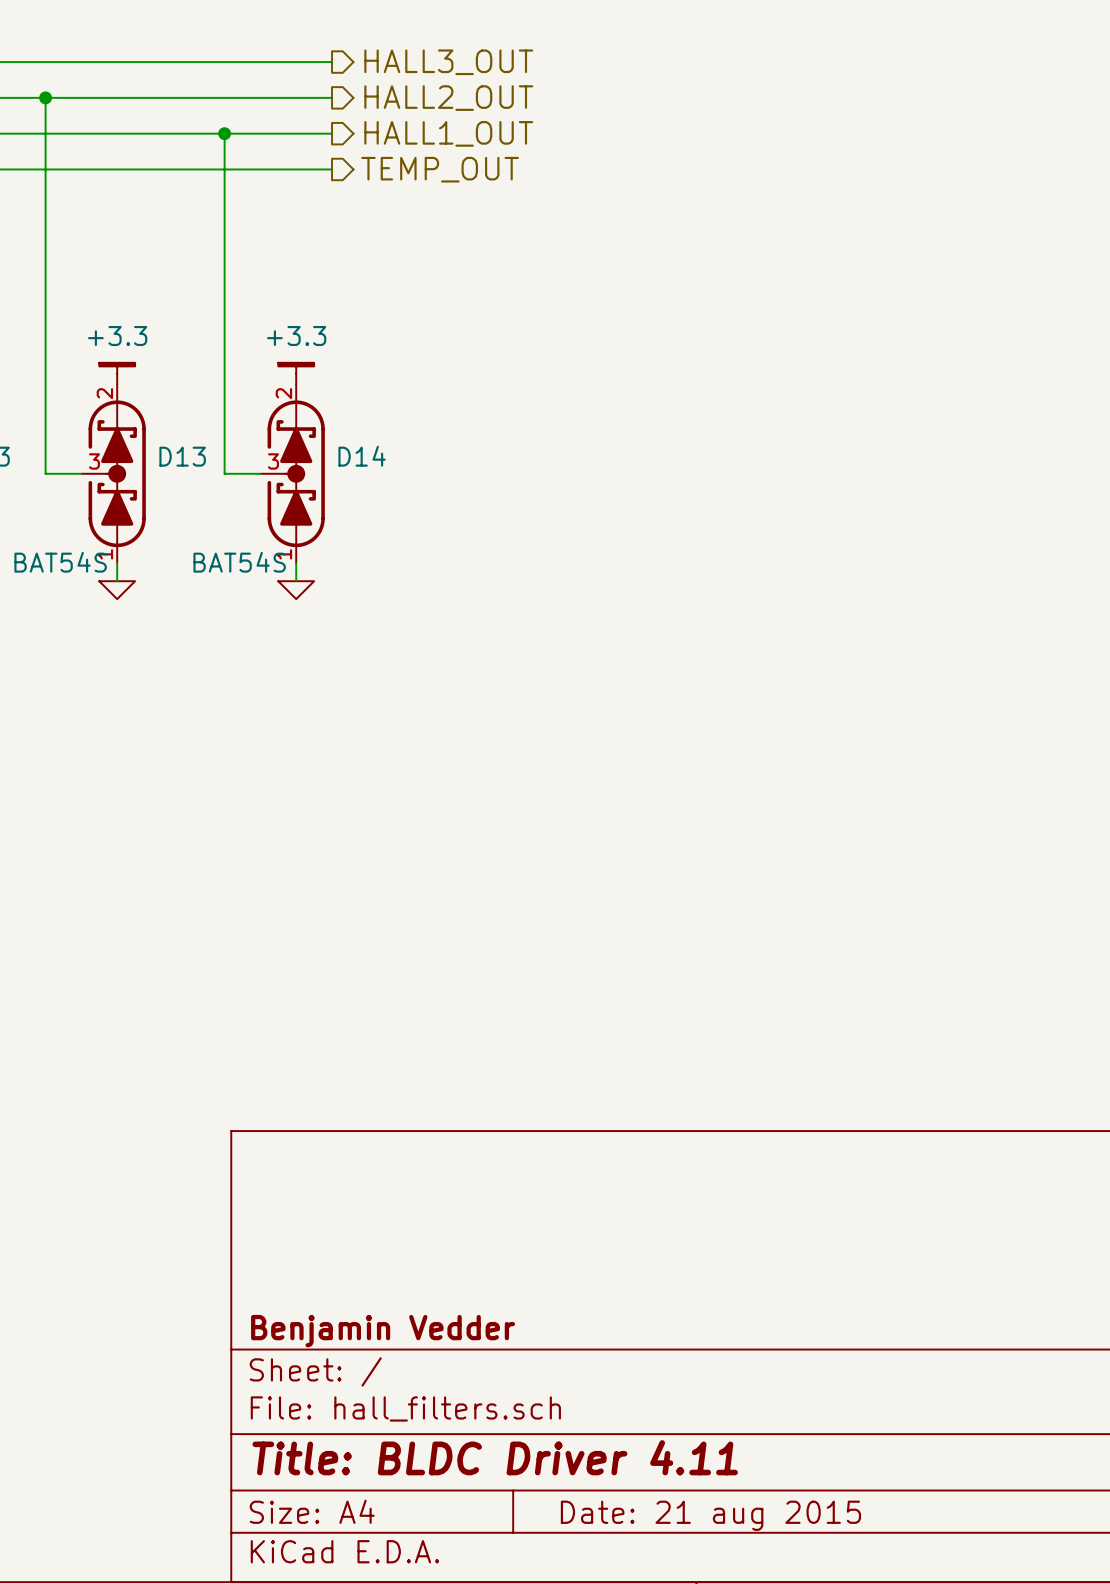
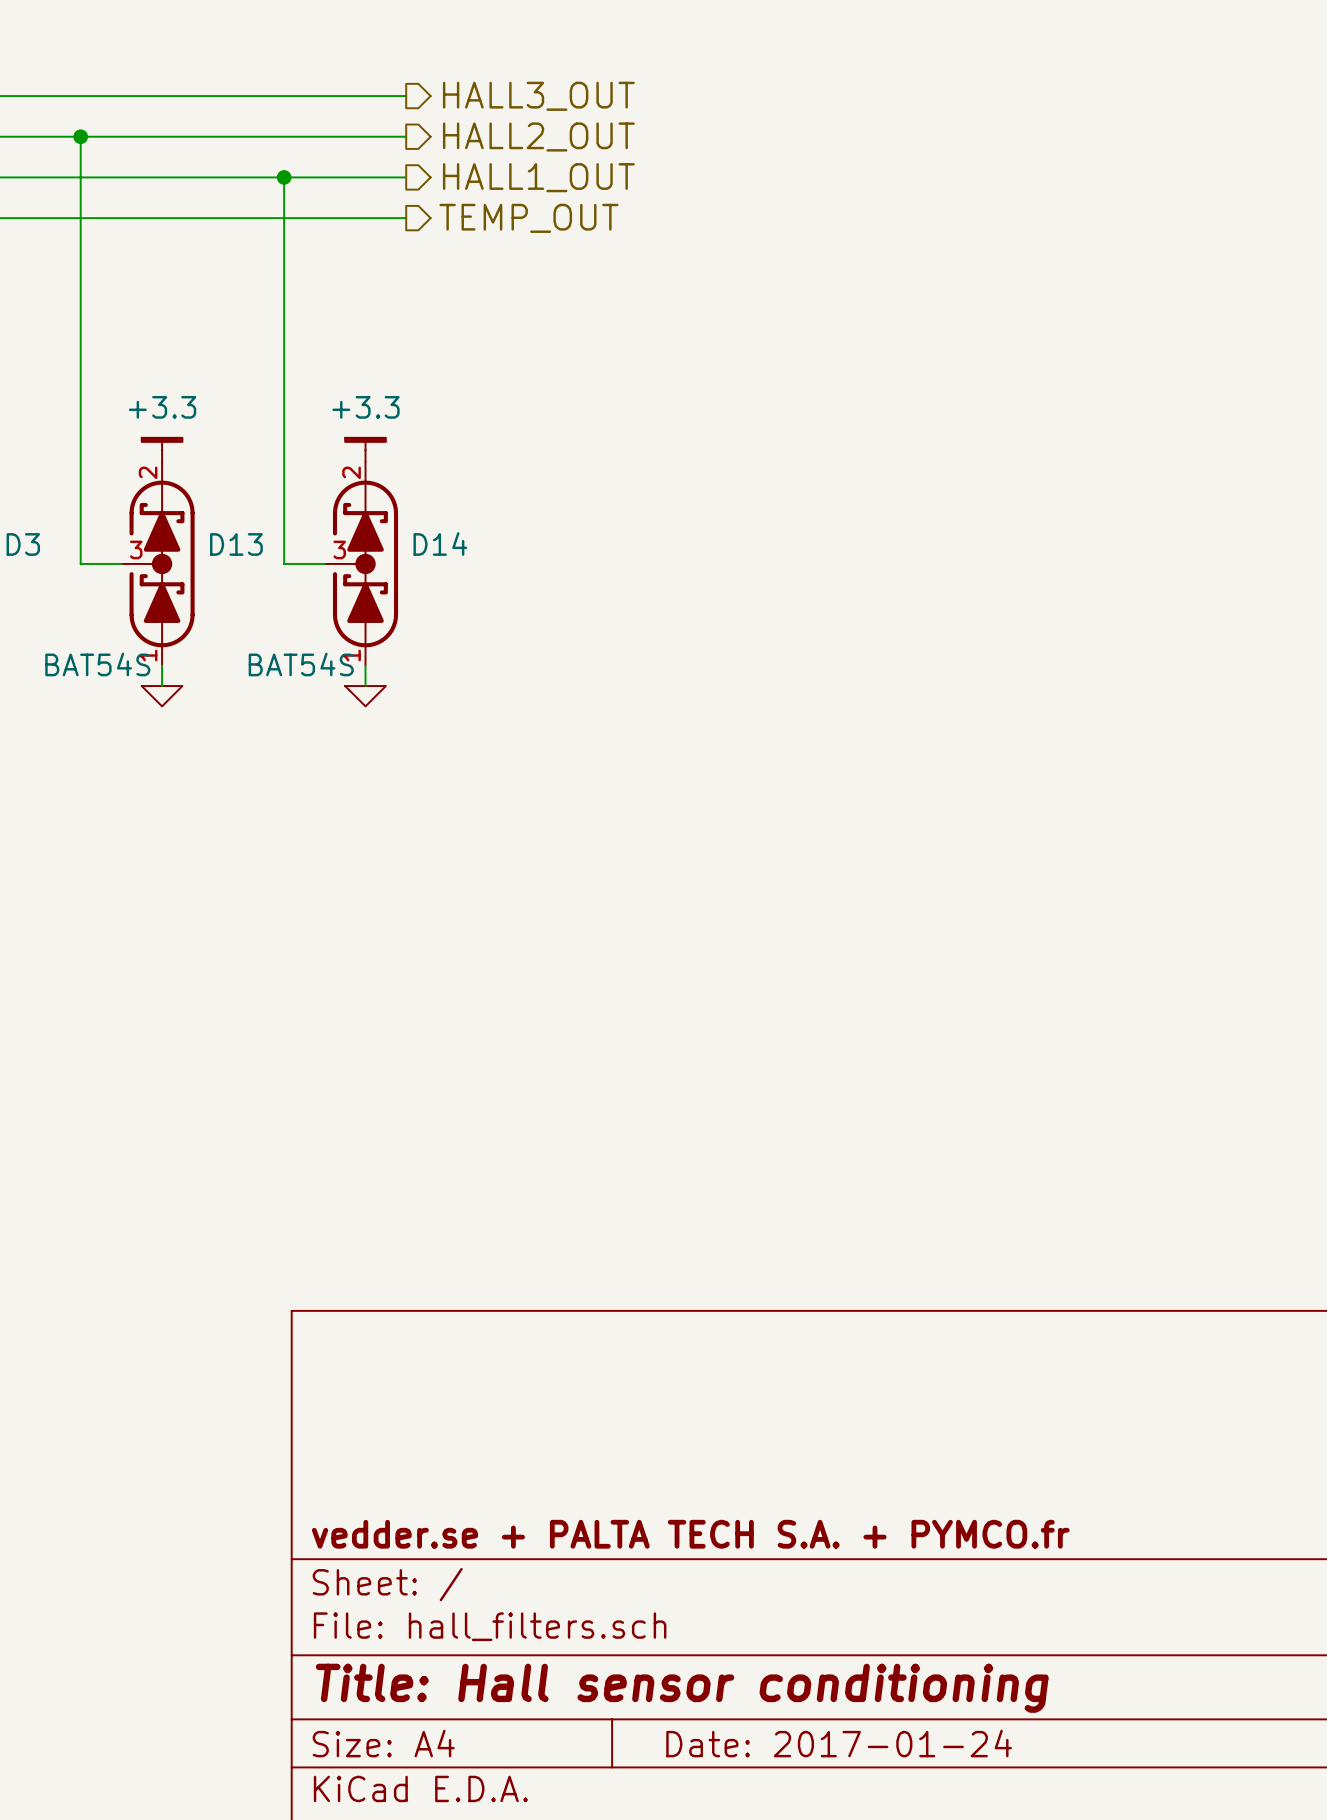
title block: Benjamin Vedder (383, 1331) -> vedder.se + PALTA TECH S.A. + PYMCO.fr (690, 1534)
title block: Title: BLDC Driver 4.11 (495, 1457) -> Title: Hall sensor conditioning (682, 1688)
title block: Date: 21 aug 2015 (710, 1515) -> Date: 2017-01-24 (839, 1743)

